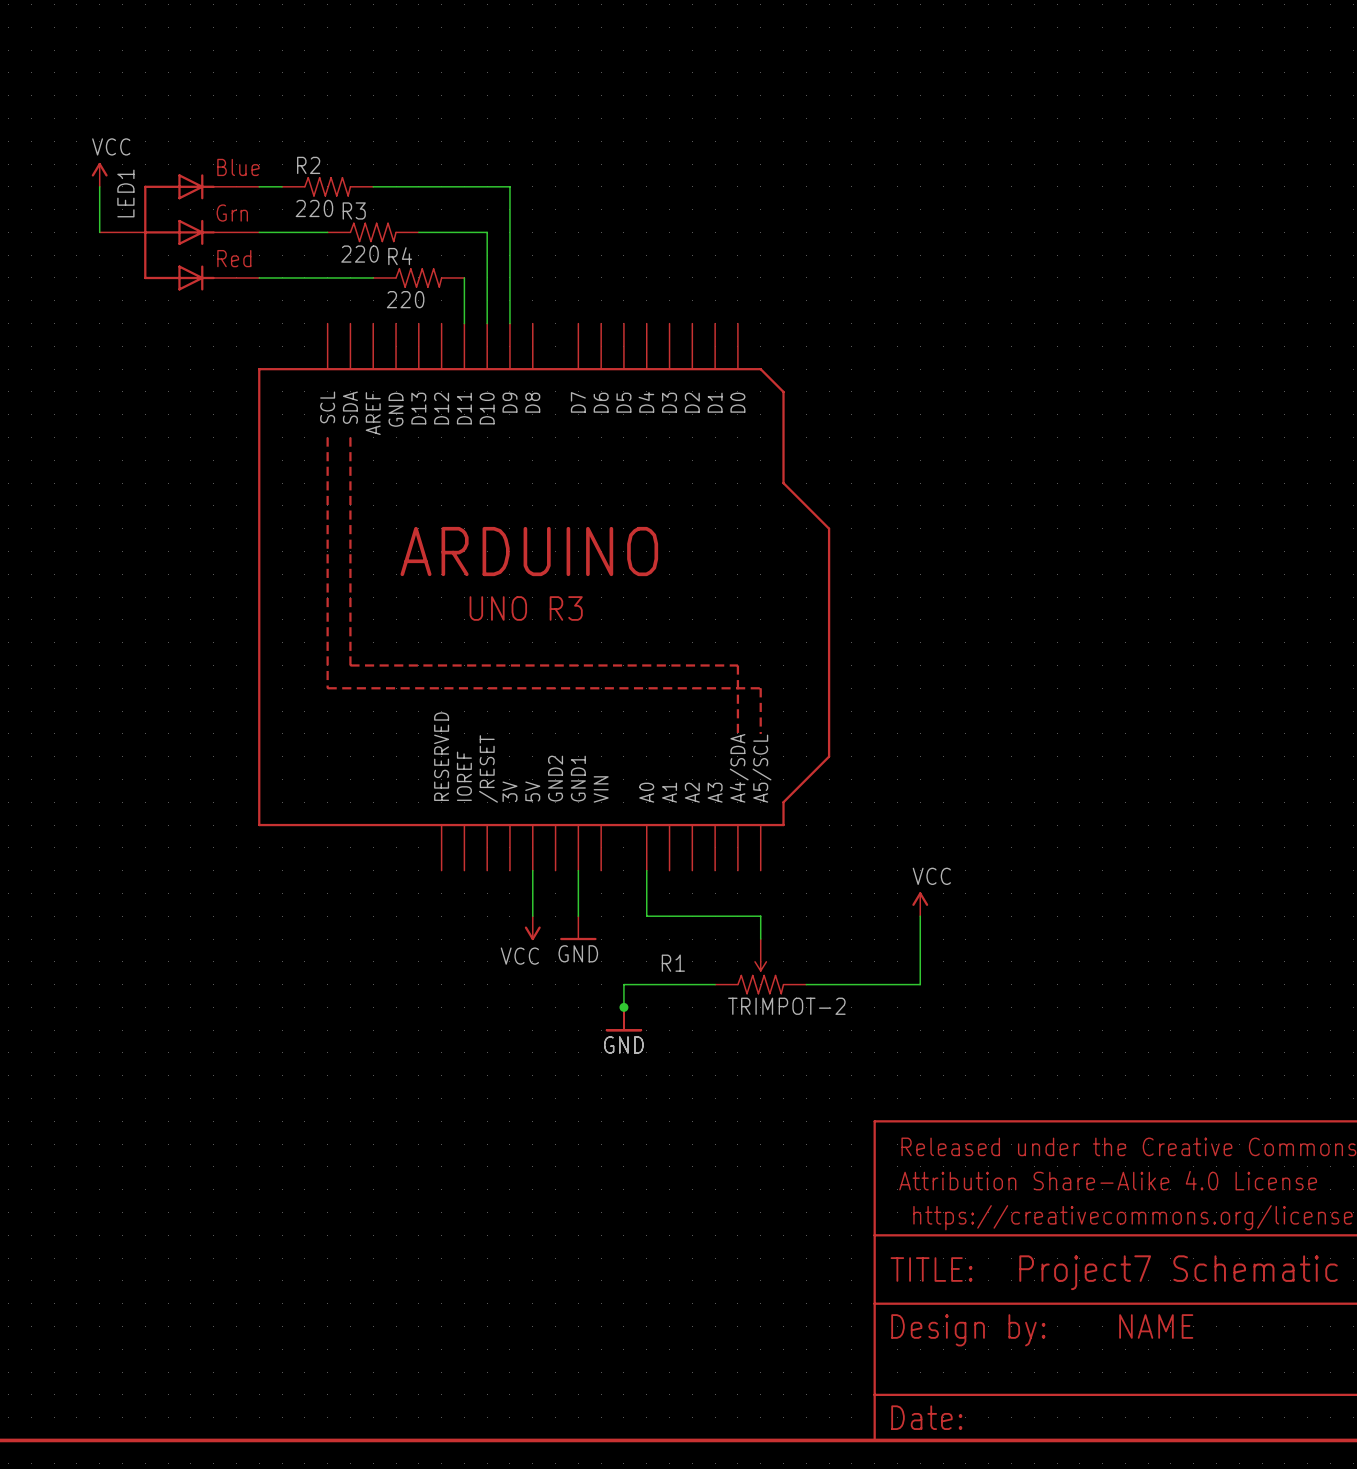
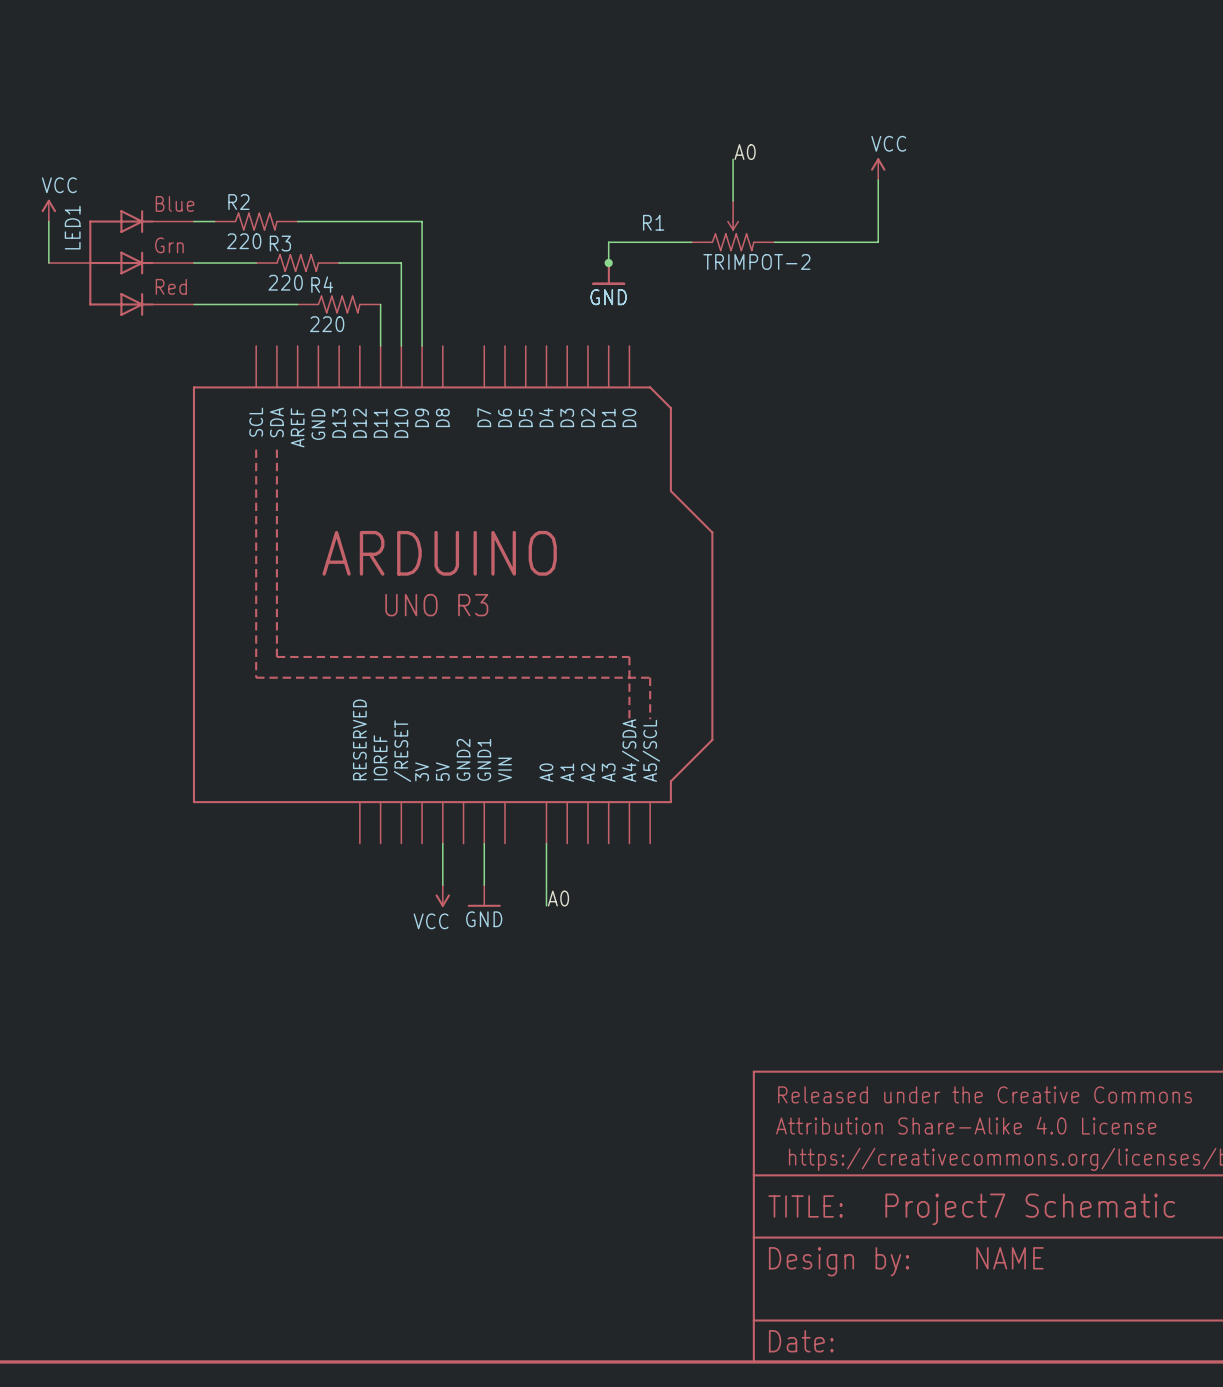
label: none -> A0 (745, 152)
wire: none -> (733, 159) (733, 200)
power symbol: none -> VCC (878, 169)
wire: none -> (878, 180) (878, 242) (774, 242)
wire: none -> (691, 242) (608, 242) (608, 263)
junction: none -> (608, 263)
power symbol: none -> GND (608, 273)
power symbol: VCC (920, 904) -> none
wire: (646, 916) (760, 916) (760, 939) -> (546, 885) (546, 905)
wire: (920, 916) (920, 984) (806, 984) -> none
label: none -> A0 (558, 898)
R1 position: (760, 966) -> (733, 225)
wire: (715, 984) (623, 984) (623, 1007) -> none
junction: (623, 1007) -> none
power symbol: GND (623, 1019) -> none

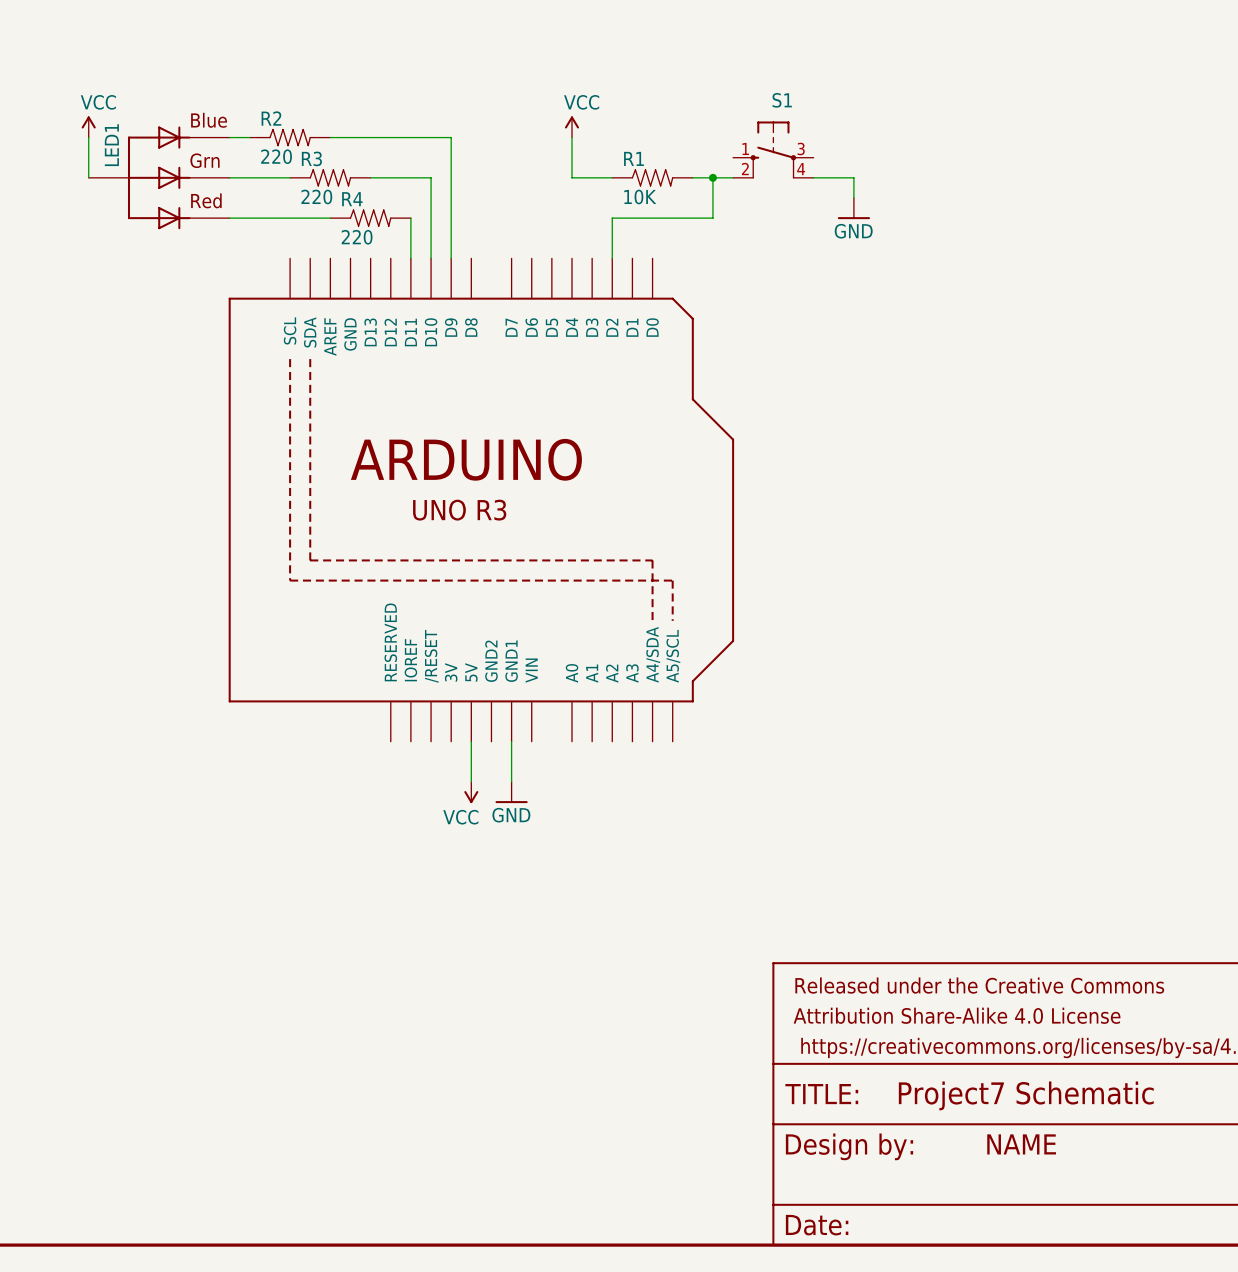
label: A0 (745, 152) -> none
wire: (733, 159) (733, 200) -> none
power symbol: VCC (878, 169) -> none
wire: (878, 180) (878, 242) (774, 242) -> none
R1 symbol: [691, 200, 775, 252] -> [612, 169, 693, 187]
power symbol: none -> VCC (572, 127)
wire: none -> (572, 137) (572, 177) (612, 177)
R1 name position: R1 (653, 222) -> R1 (633, 158)
S1: none -> (773, 149)
wire: (691, 242) (608, 242) (608, 263) -> none
R1 value: TRIMPOT-2 (756, 261) -> 10K (640, 196)
junction: (608, 263) -> none
wire: none -> (692, 177) (733, 177)
wire: none -> (712, 177) (712, 218) (612, 218) (612, 258)
junction: none -> (712, 177)
wire: none -> (813, 177) (853, 177) (853, 197)
power symbol: GND (608, 273) -> none
power symbol: none -> GND (853, 208)
wire: (546, 843) (546, 905) -> none
label: A0 (558, 898) -> none

